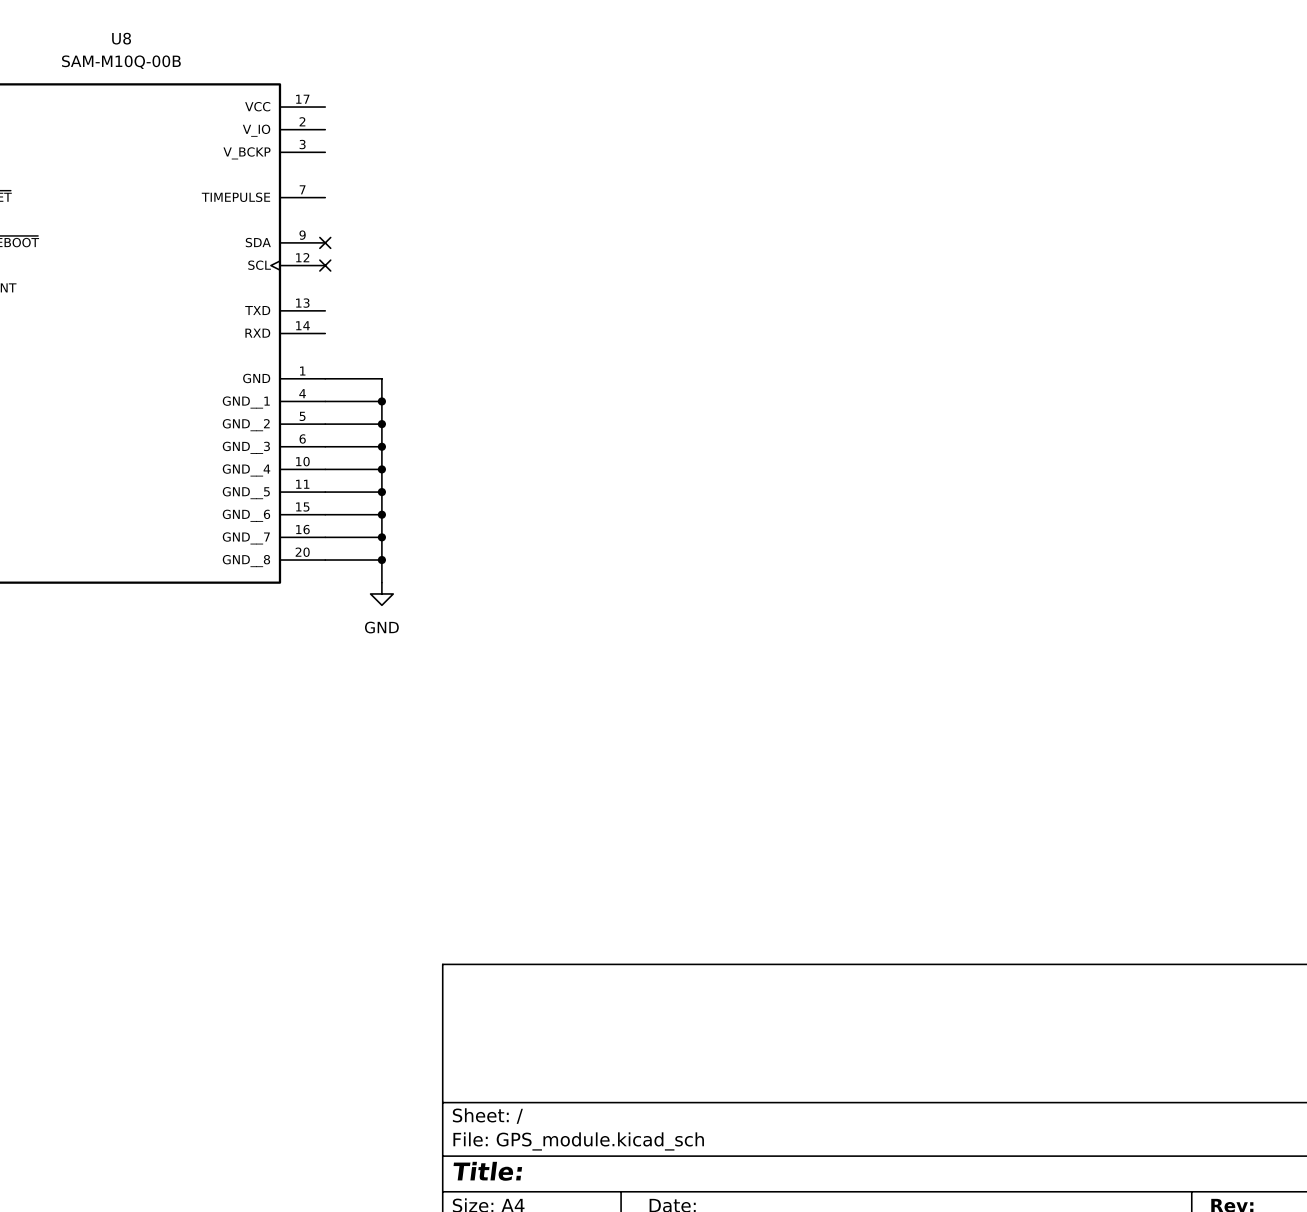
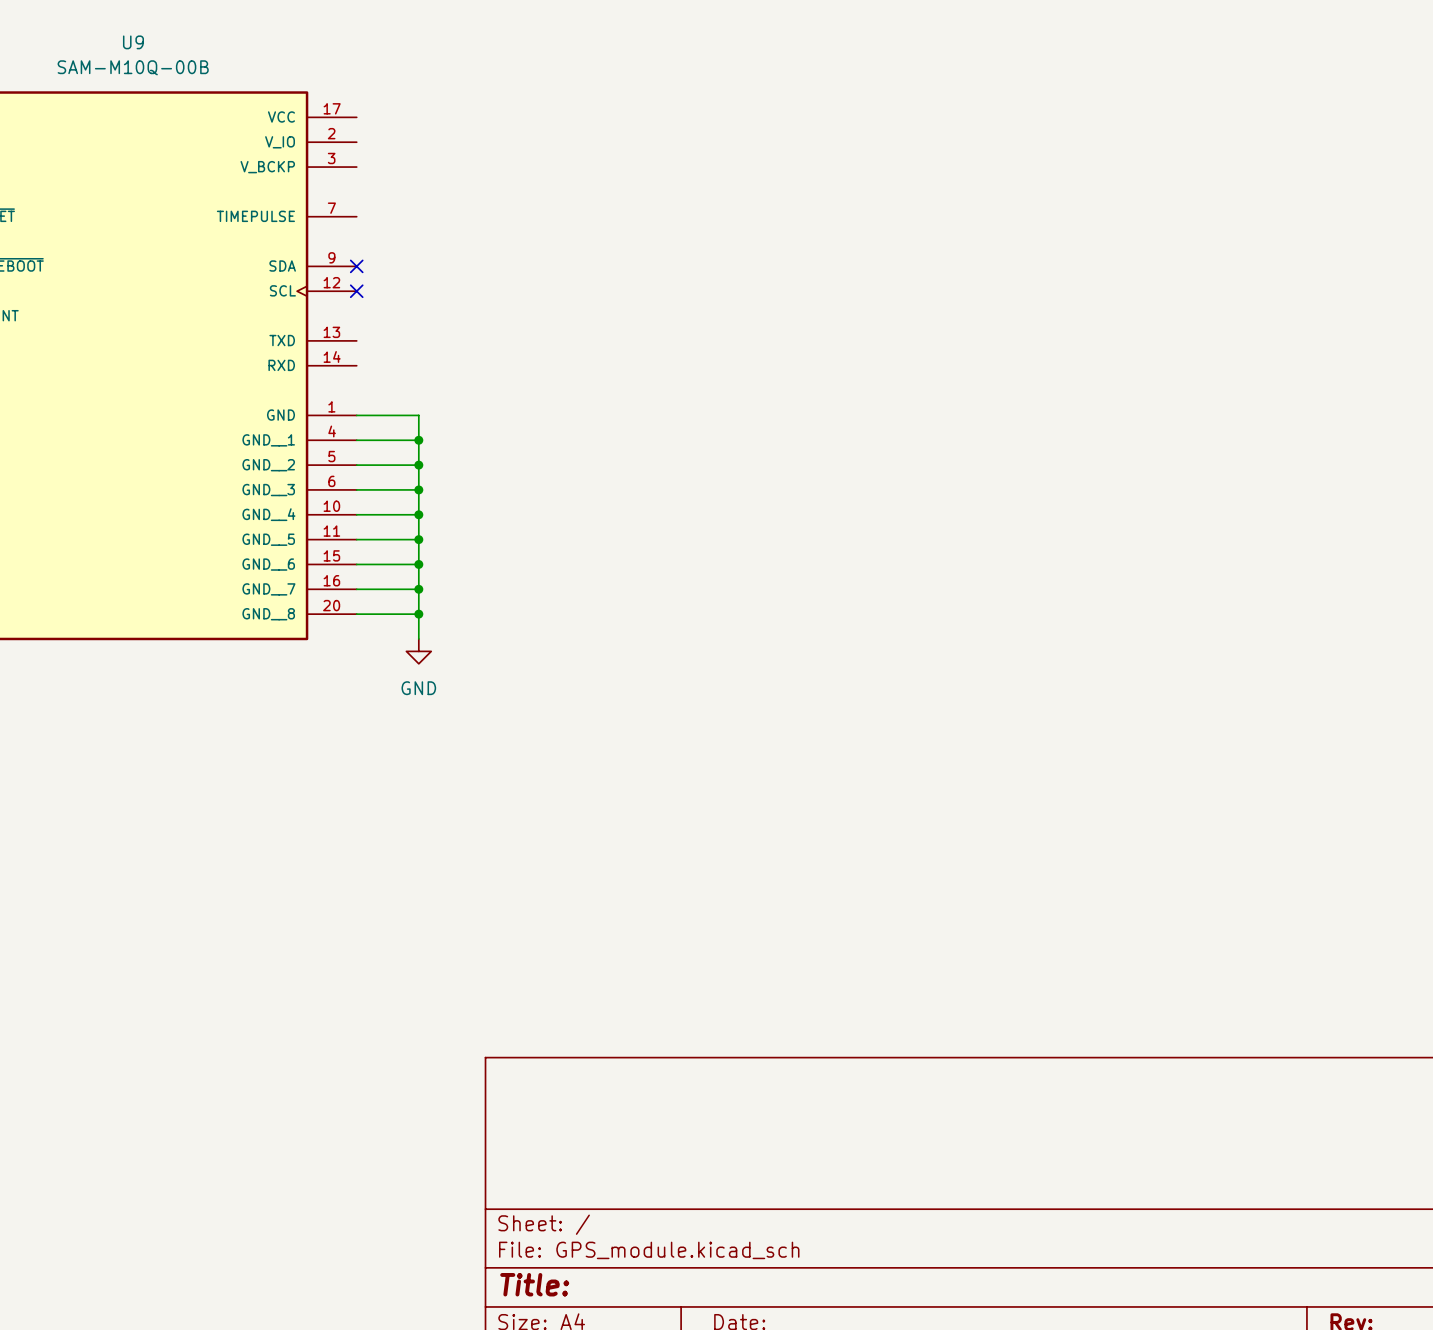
U8 name: U8 (121, 38) -> U9 (133, 42)

